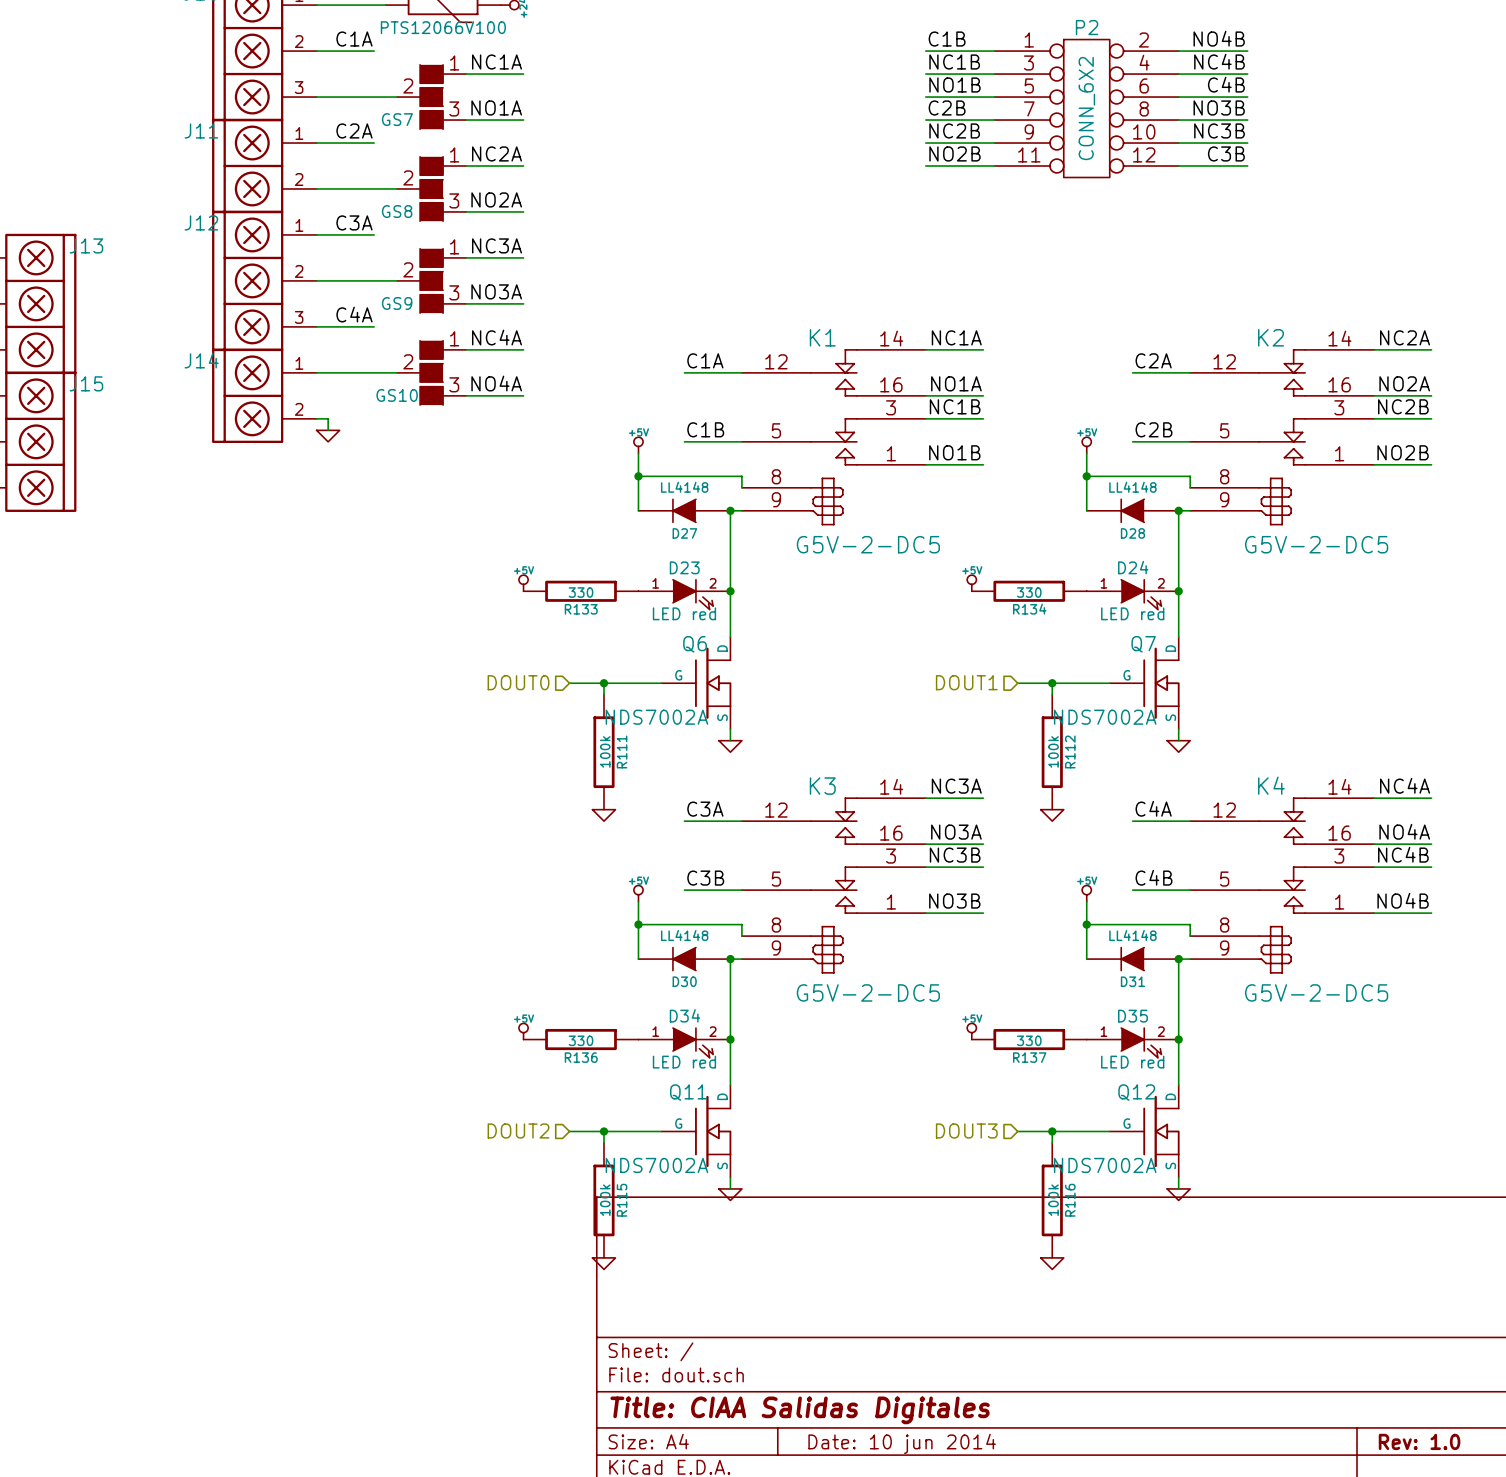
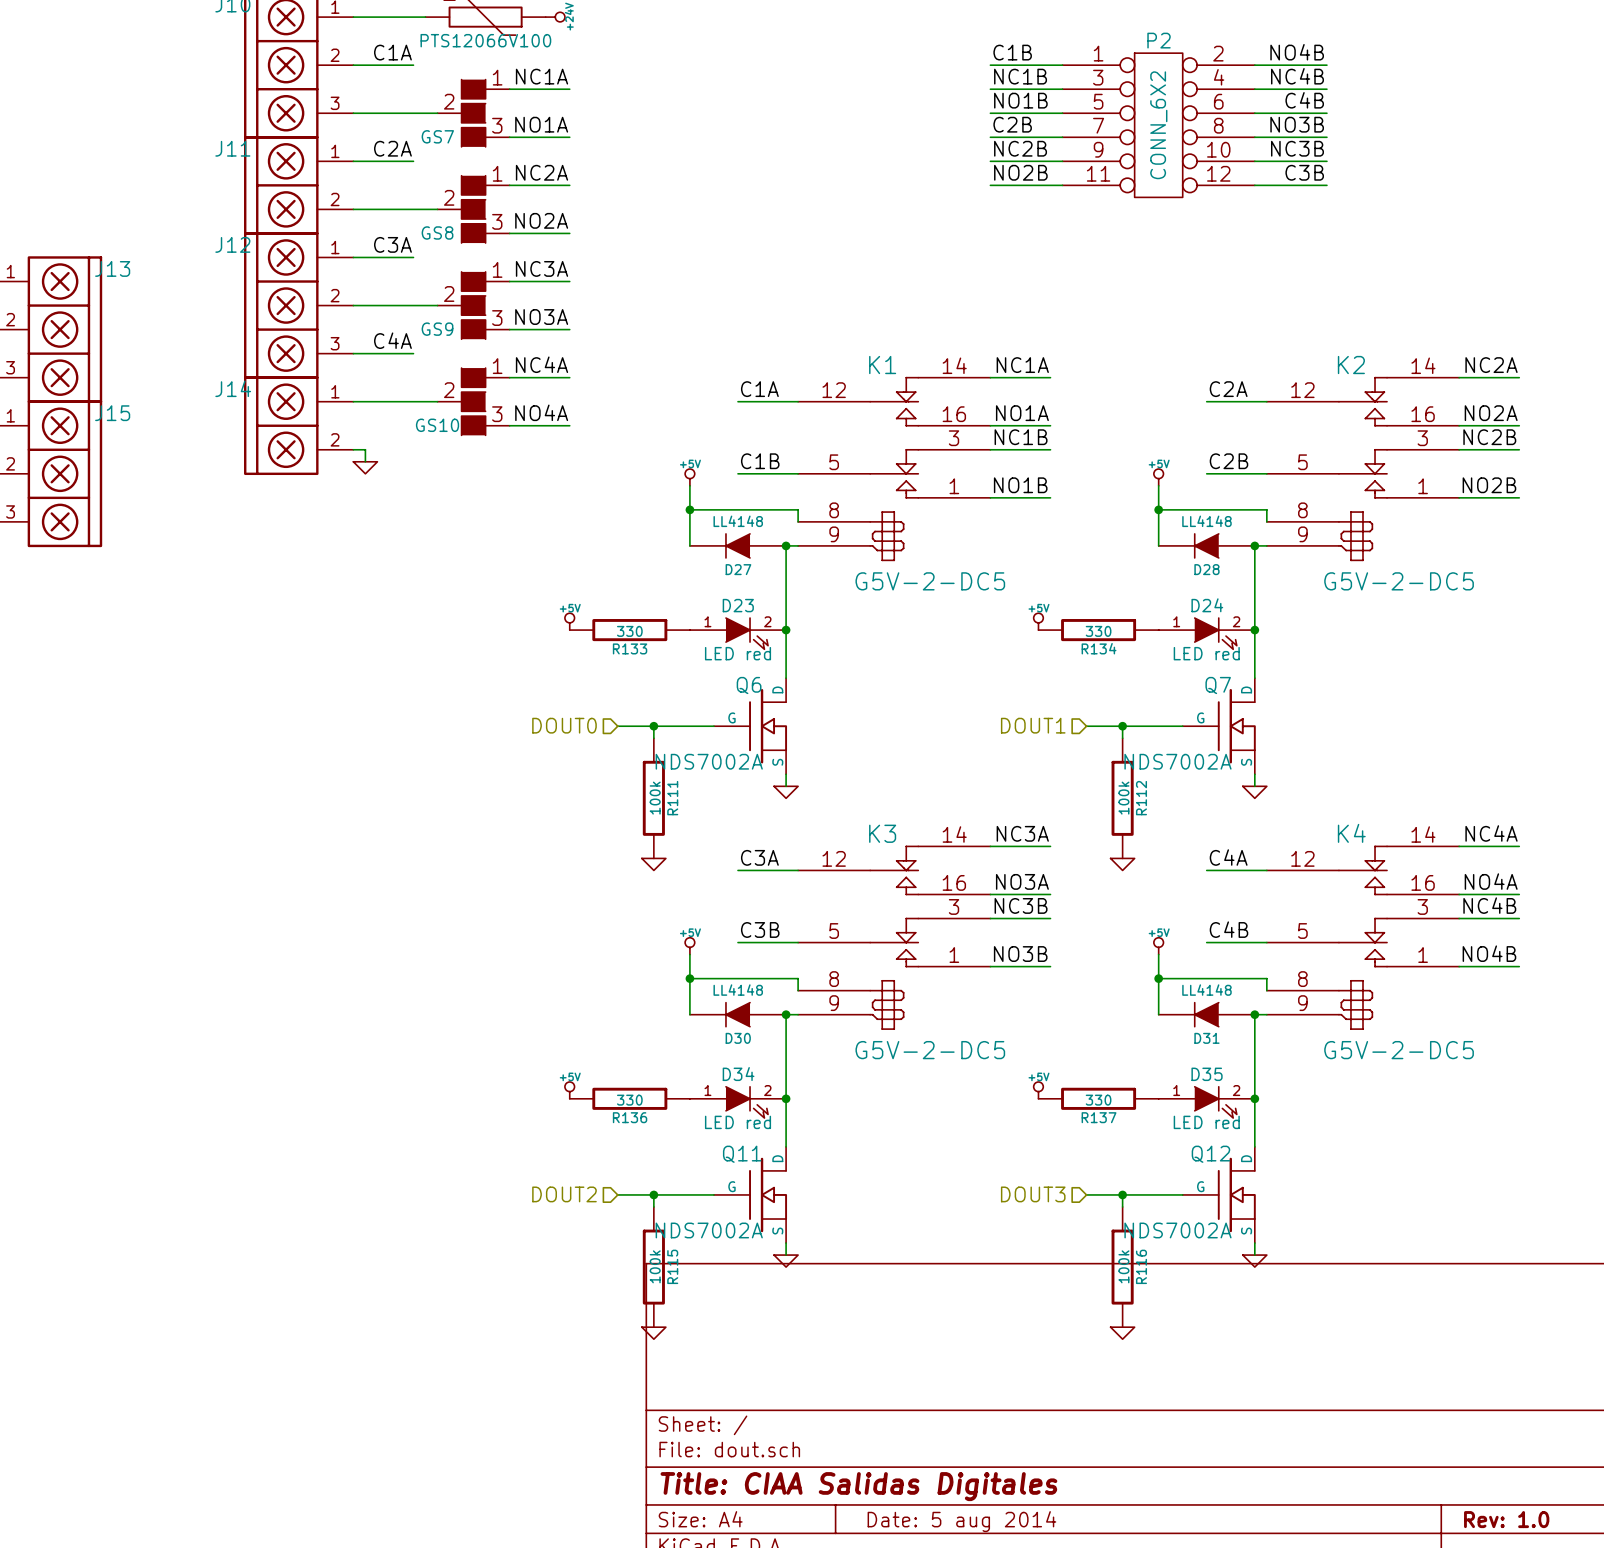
title block: Date: 10 jun 2014 (902, 1443) -> Date: 5 aug 2014 (961, 1521)

